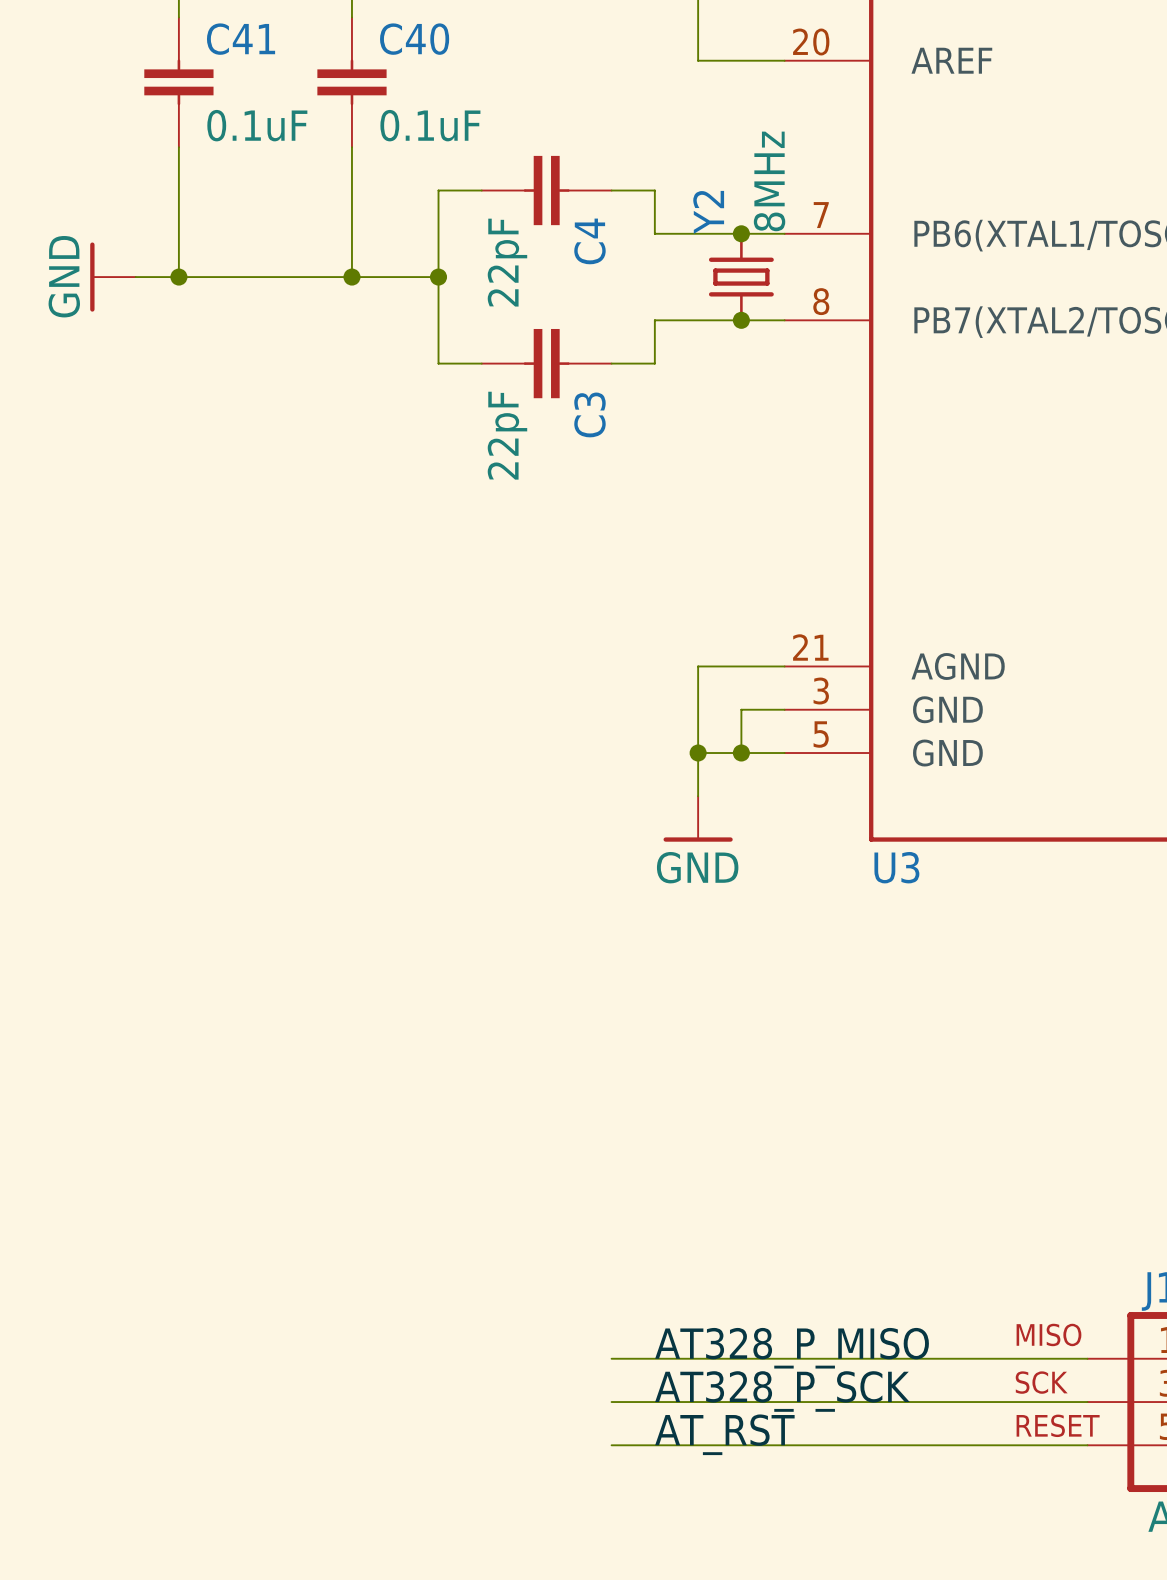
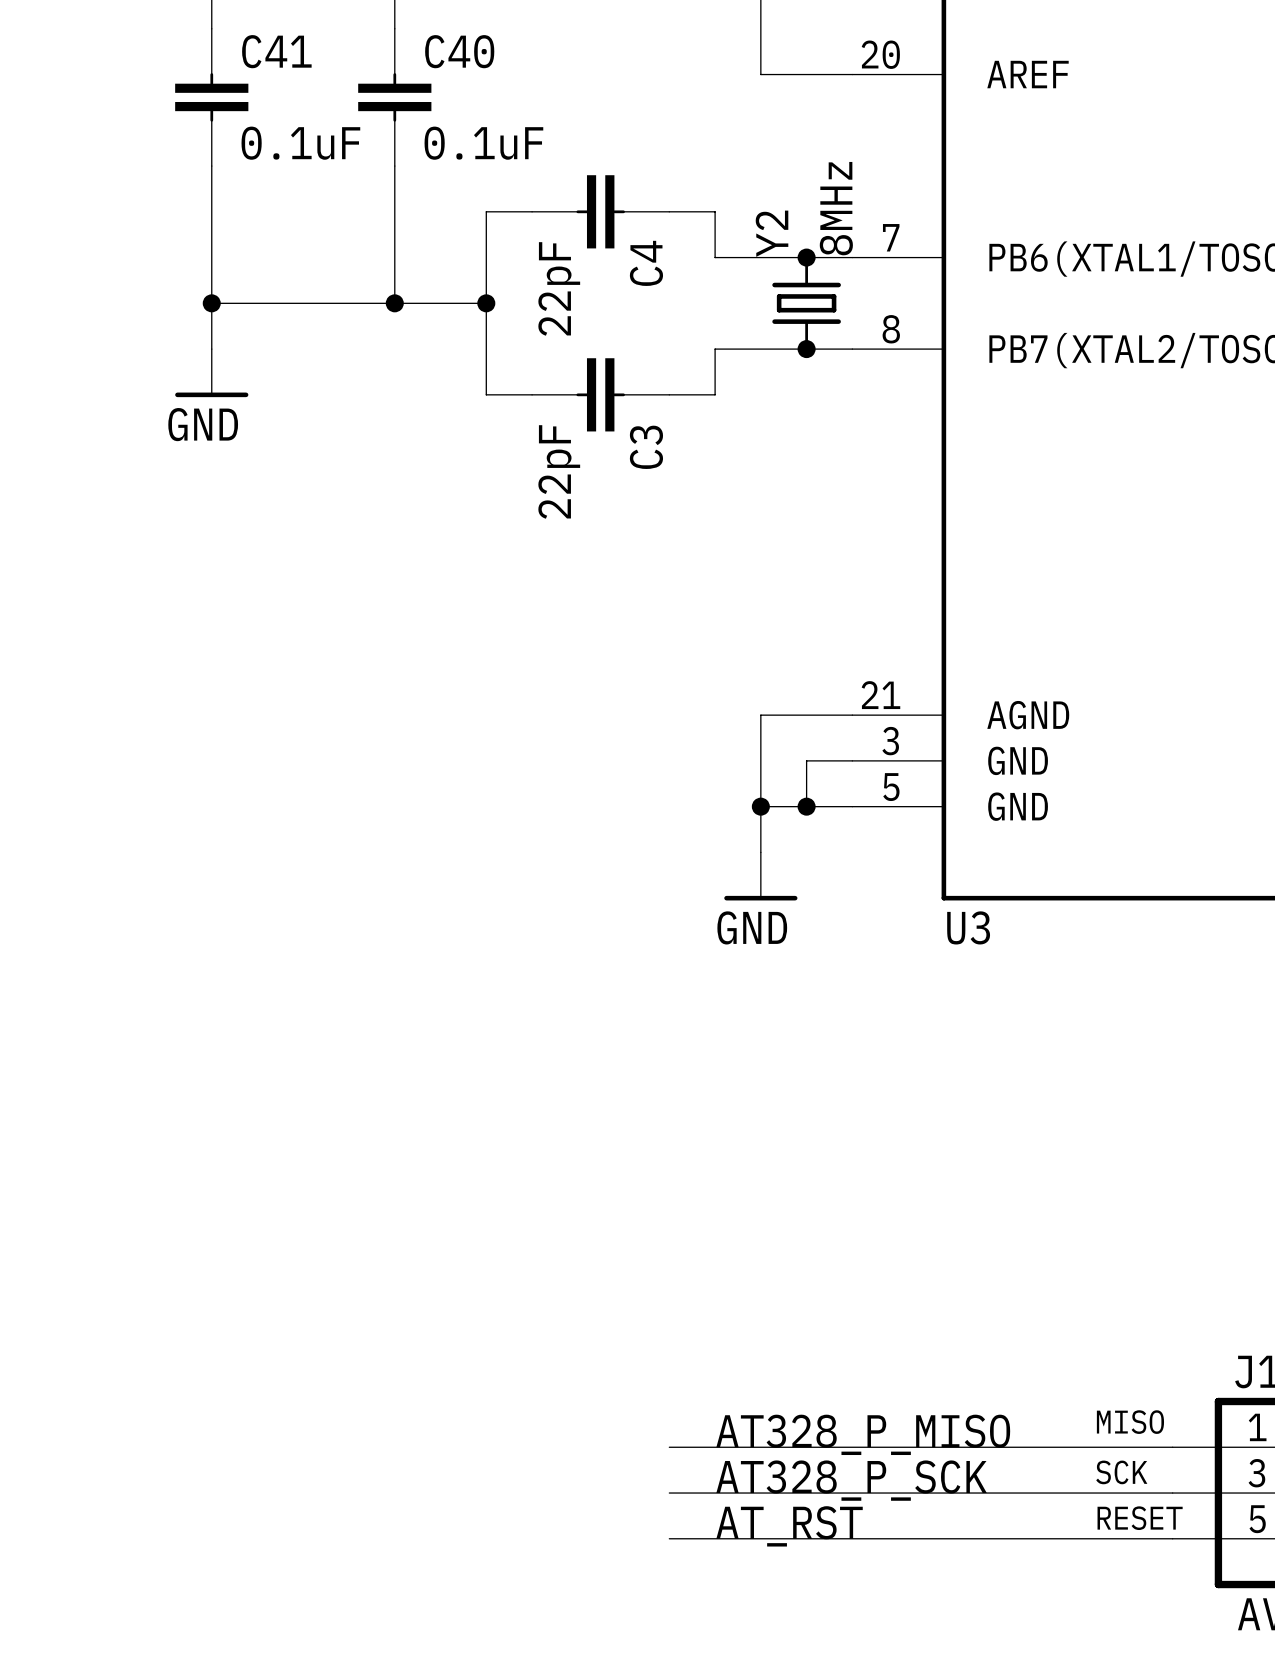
power symbol rotation: 0° (92, 277) -> 90° counterclockwise (211, 394)
power symbol position: GND (112, 277) -> GND (211, 373)
wire: (135, 277) (178, 277) -> (211, 349) (211, 303)

